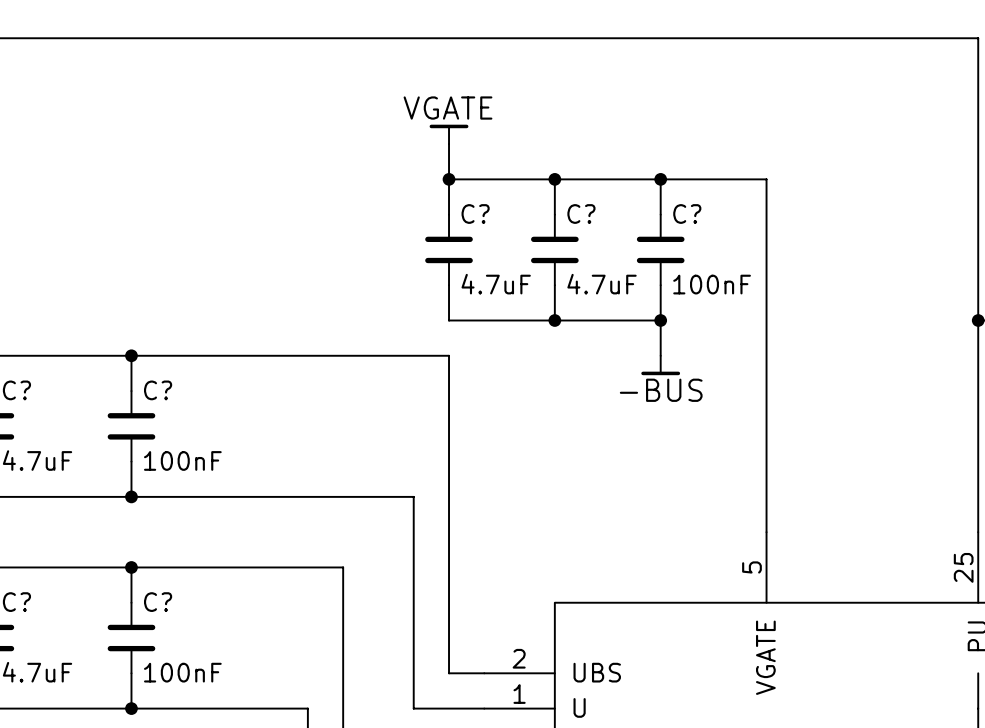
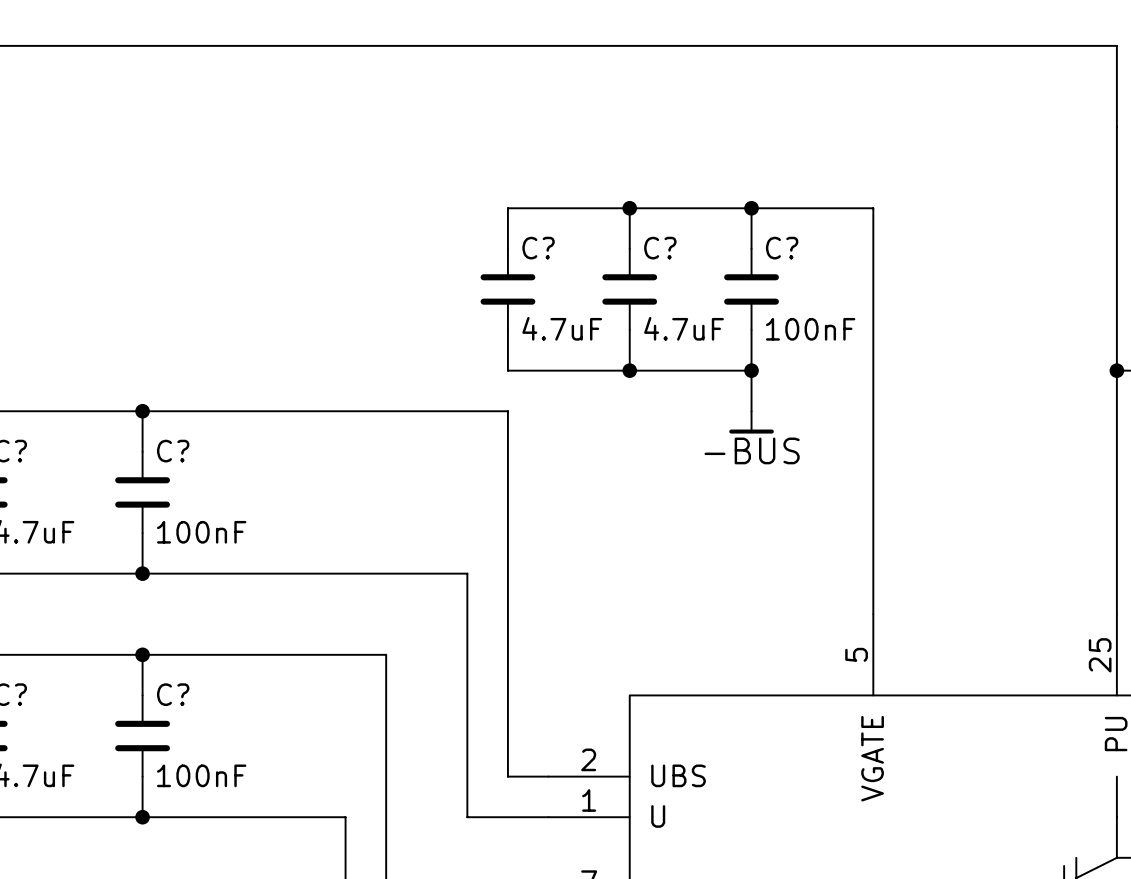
power symbol: VGATE (449, 134) -> none
wire: (449, 144) (449, 179) -> none
junction: (449, 179) -> none

